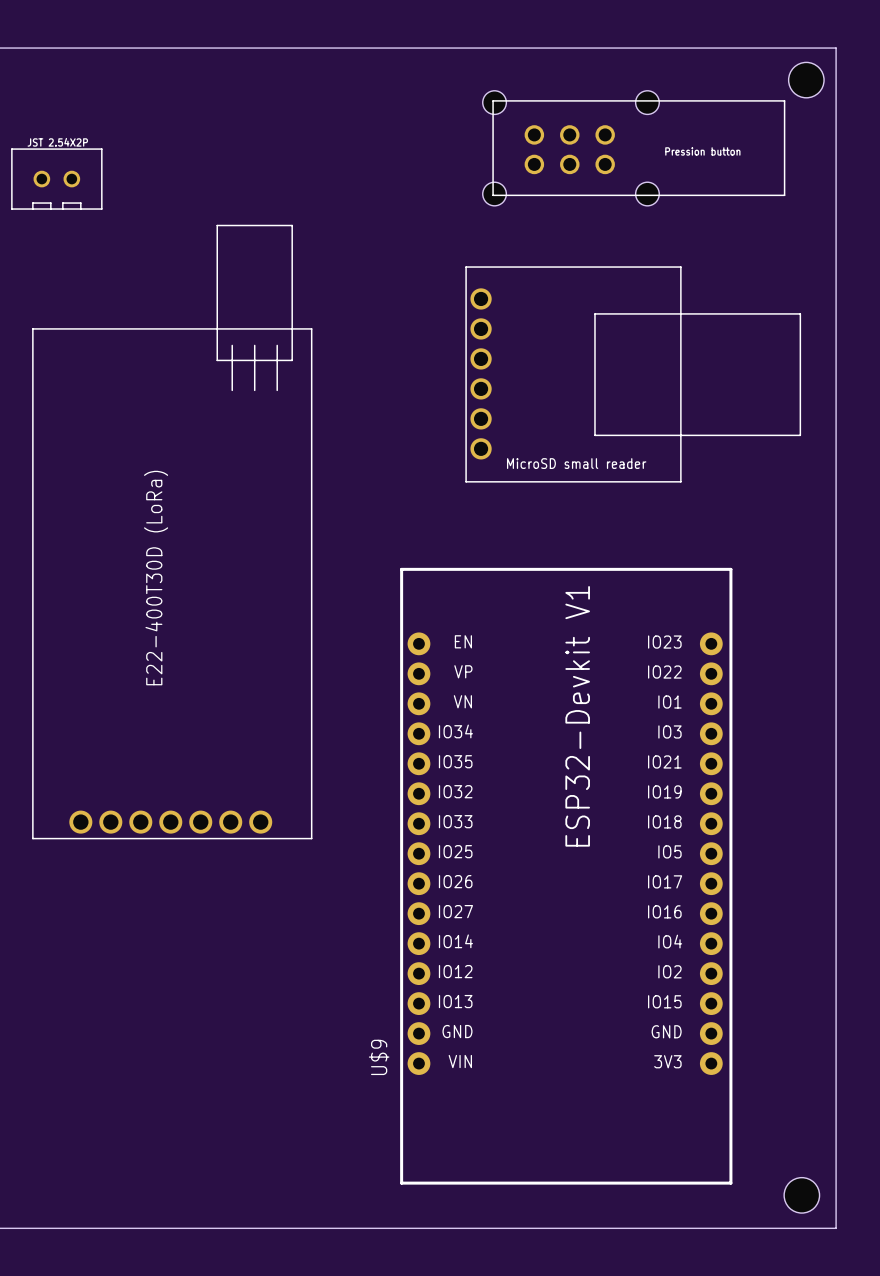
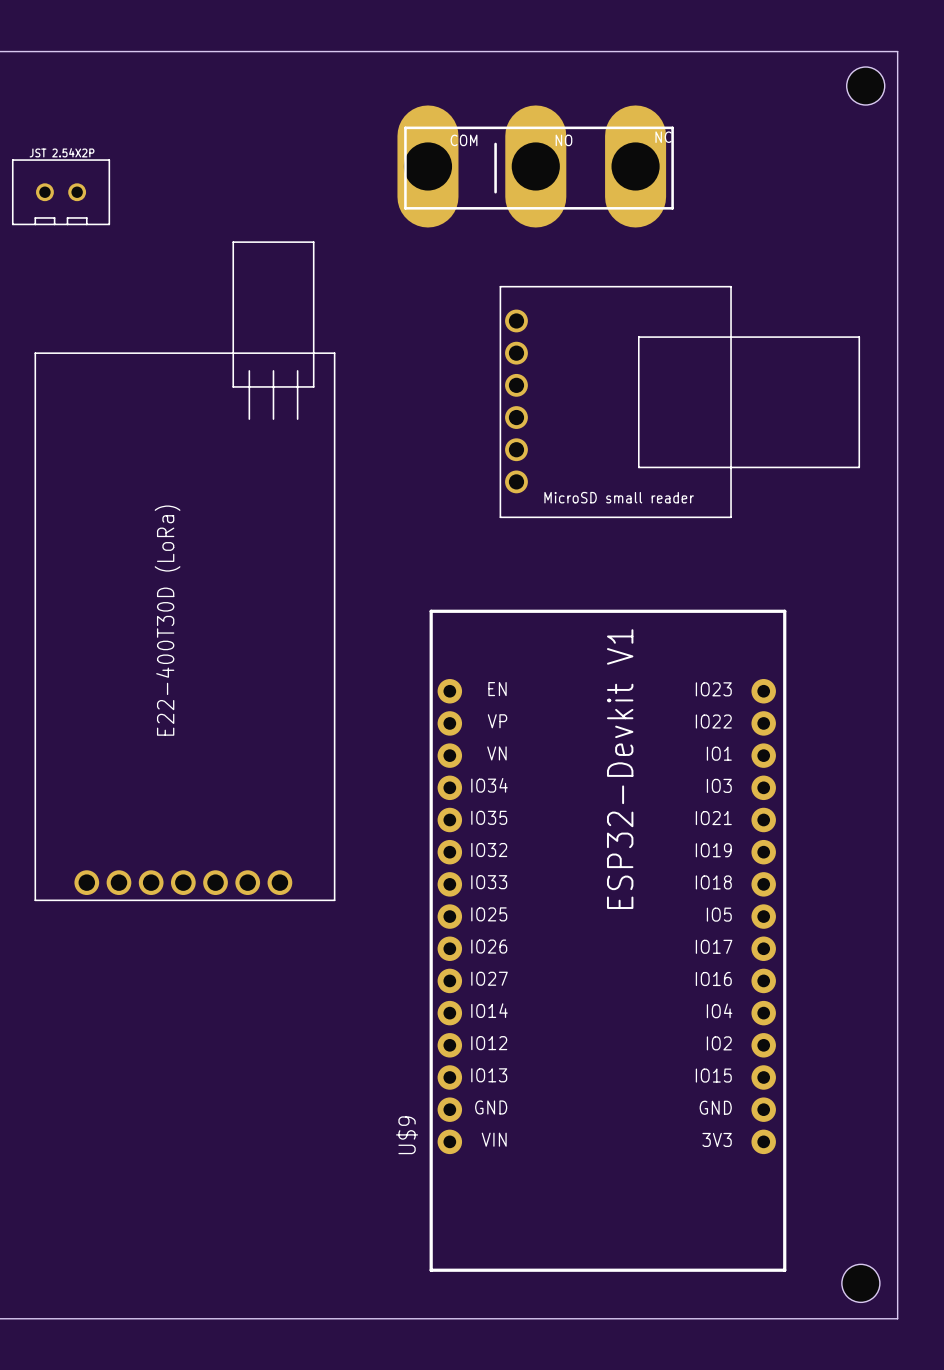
part: (634, 148) -> none
part: none -> (535, 166)

